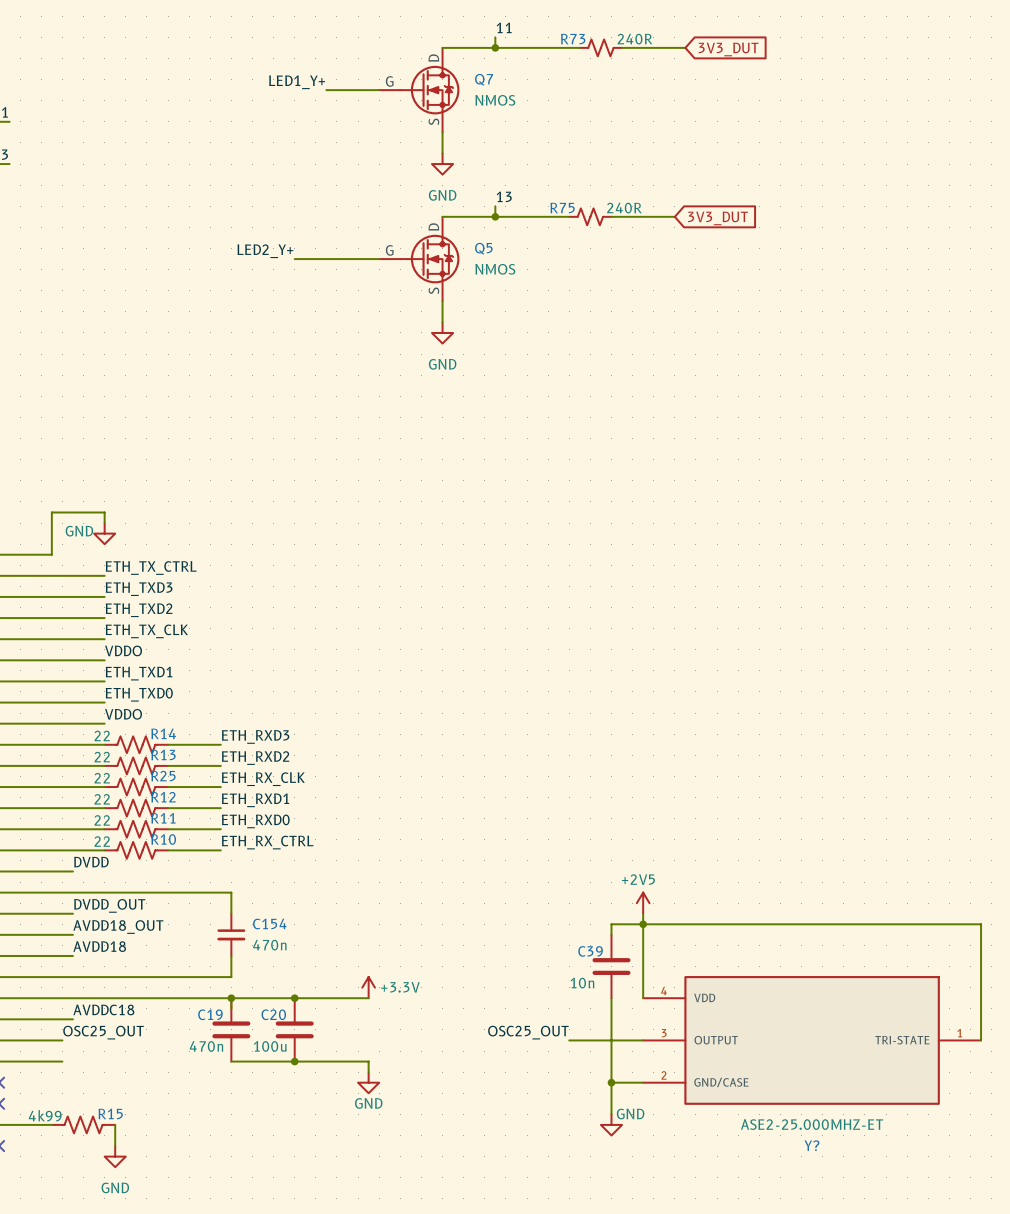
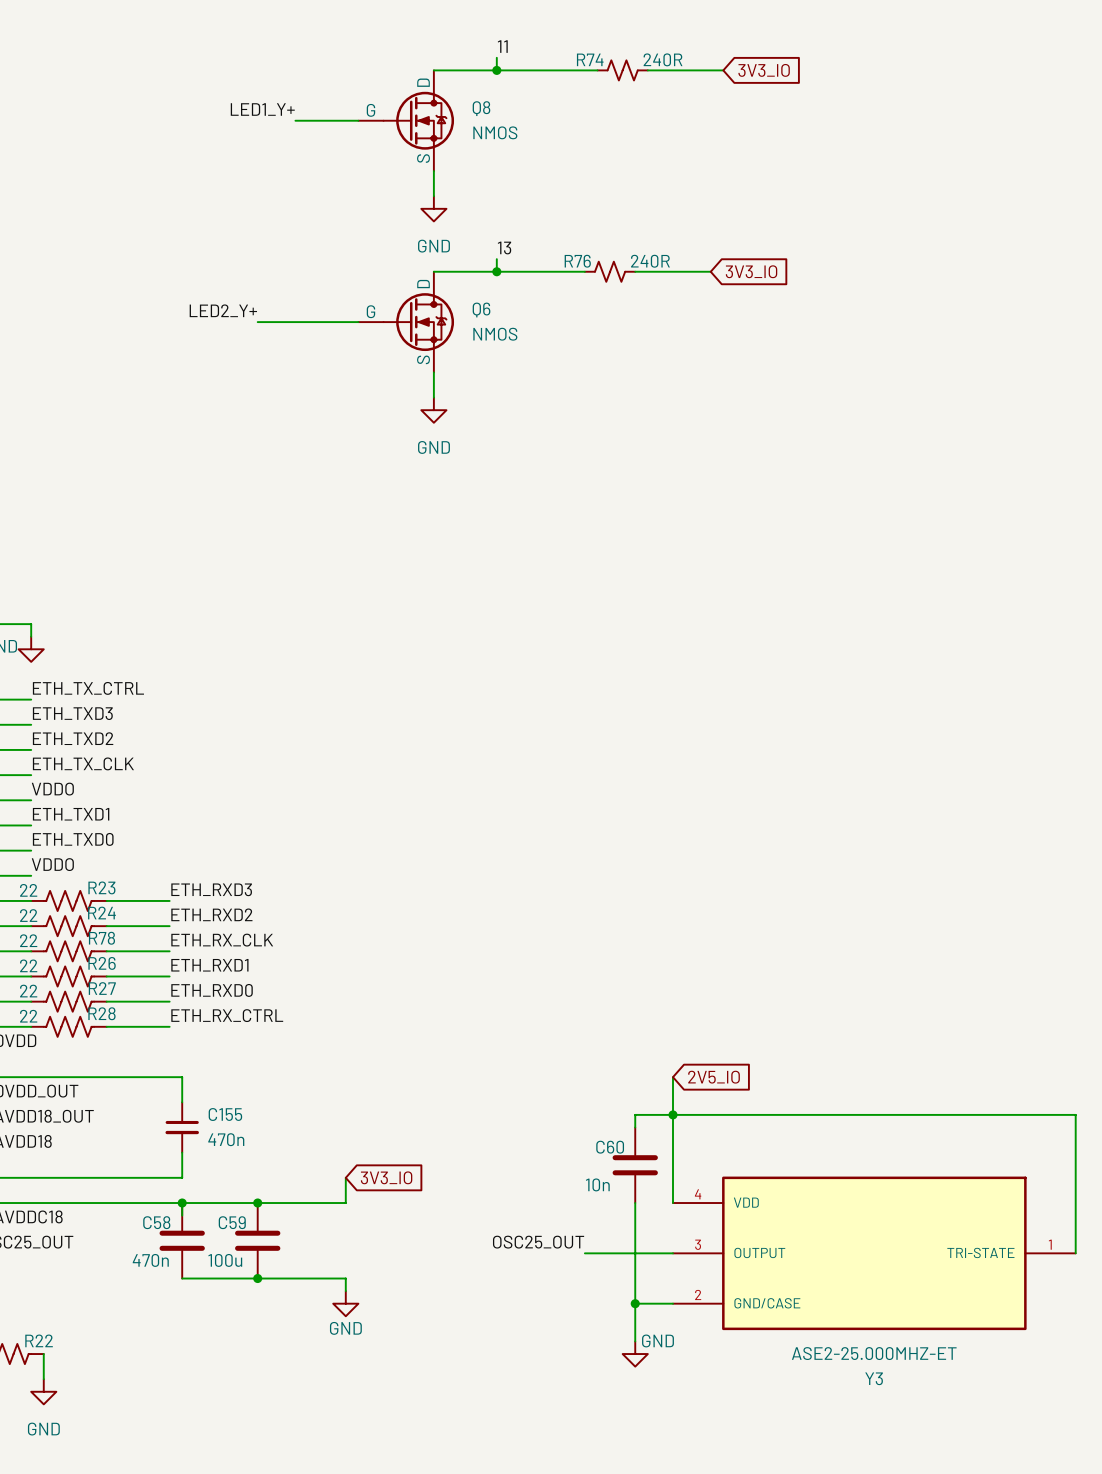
R73 name: R73 (573, 39) -> R74 (590, 59)
global label: 3V3_DUT (728, 49) -> 3V3_IO (764, 70)
Q7 name: Q7 (484, 79) -> Q8 (481, 108)
R75 name: R75 (562, 208) -> R76 (577, 261)
global label: 3V3_DUT (718, 218) -> 3V3_IO (751, 271)
Q5 name: Q5 (483, 248) -> Q6 (481, 309)
R14 name: R14 (163, 733) -> R23 (101, 887)
R13 name: R13 (163, 754) -> R24 (101, 913)
R25 name: R25 (163, 776) -> R78 (101, 938)
R12 name: R12 (163, 797) -> R26 (102, 963)
R11 name: R11 (163, 818) -> R27 (102, 988)
R10 name: R10 (163, 839) -> R28 (101, 1013)
global label: none -> 2V5_IO (714, 1077)
power symbol: +2V5 (643, 903) -> none
C154 name: C154 (269, 924) -> C155 (225, 1114)
C39 name: C39 (590, 951) -> C60 (610, 1147)
global label: none -> 3V3_IO (386, 1177)
power symbol: +3.3V (368, 987) -> none
C19 name: C19 (210, 1014) -> C58 (156, 1222)
C20 name: C20 (273, 1014) -> C59 (232, 1222)
R15 name: R15 (110, 1113) -> R22 (39, 1340)
Y? name: Y? (811, 1145) -> Y3 (874, 1378)

